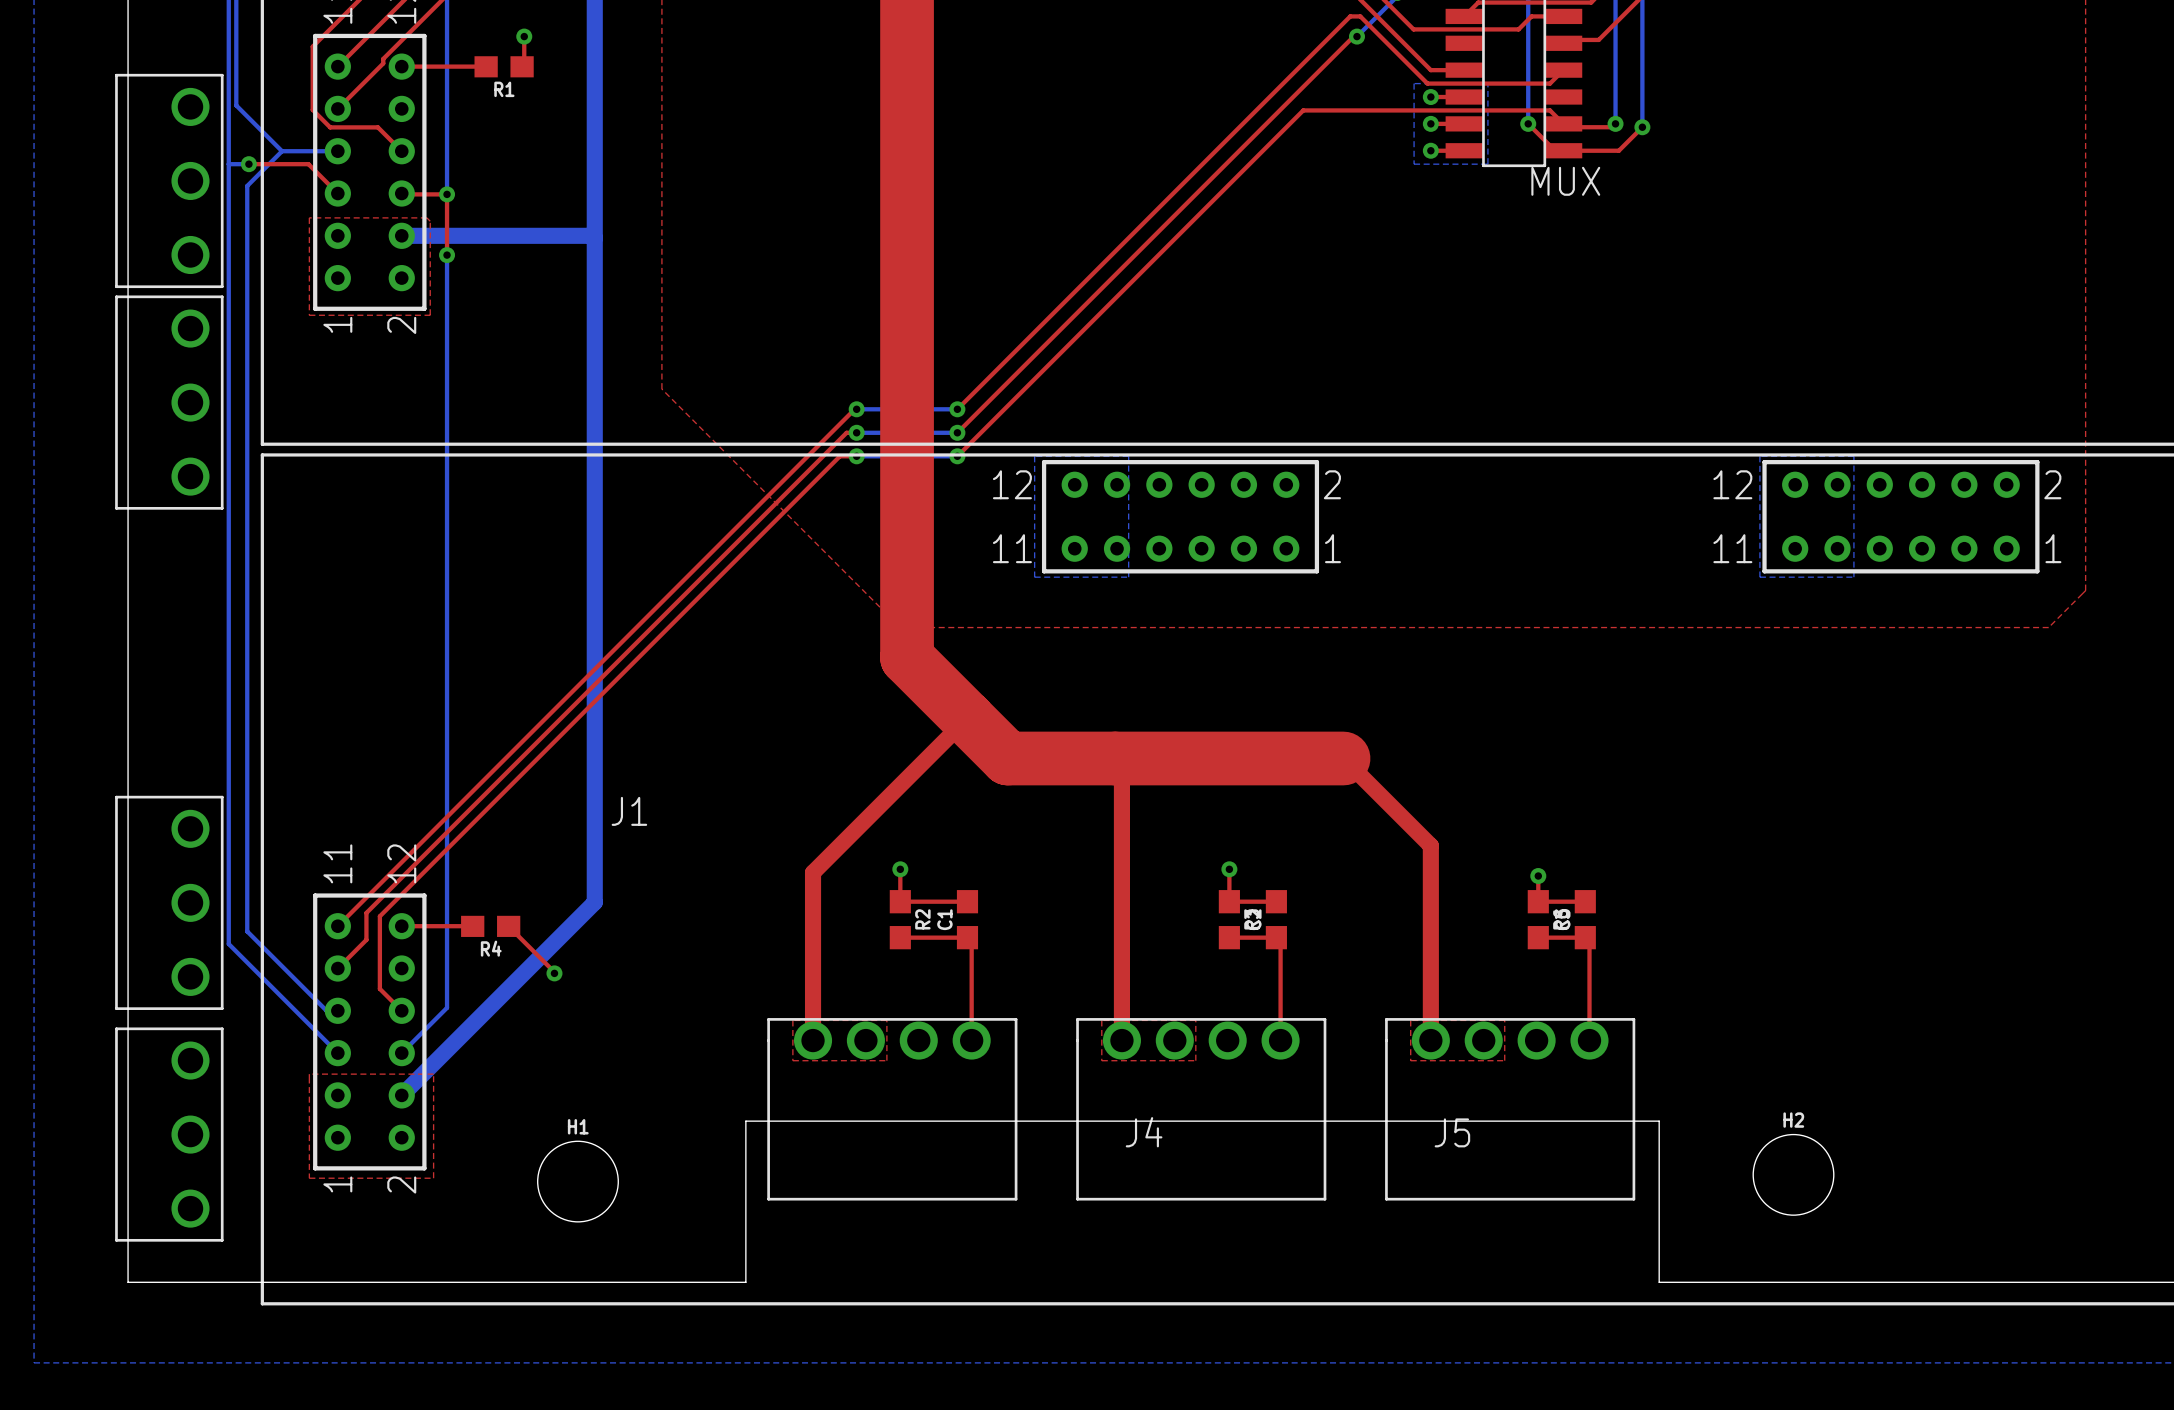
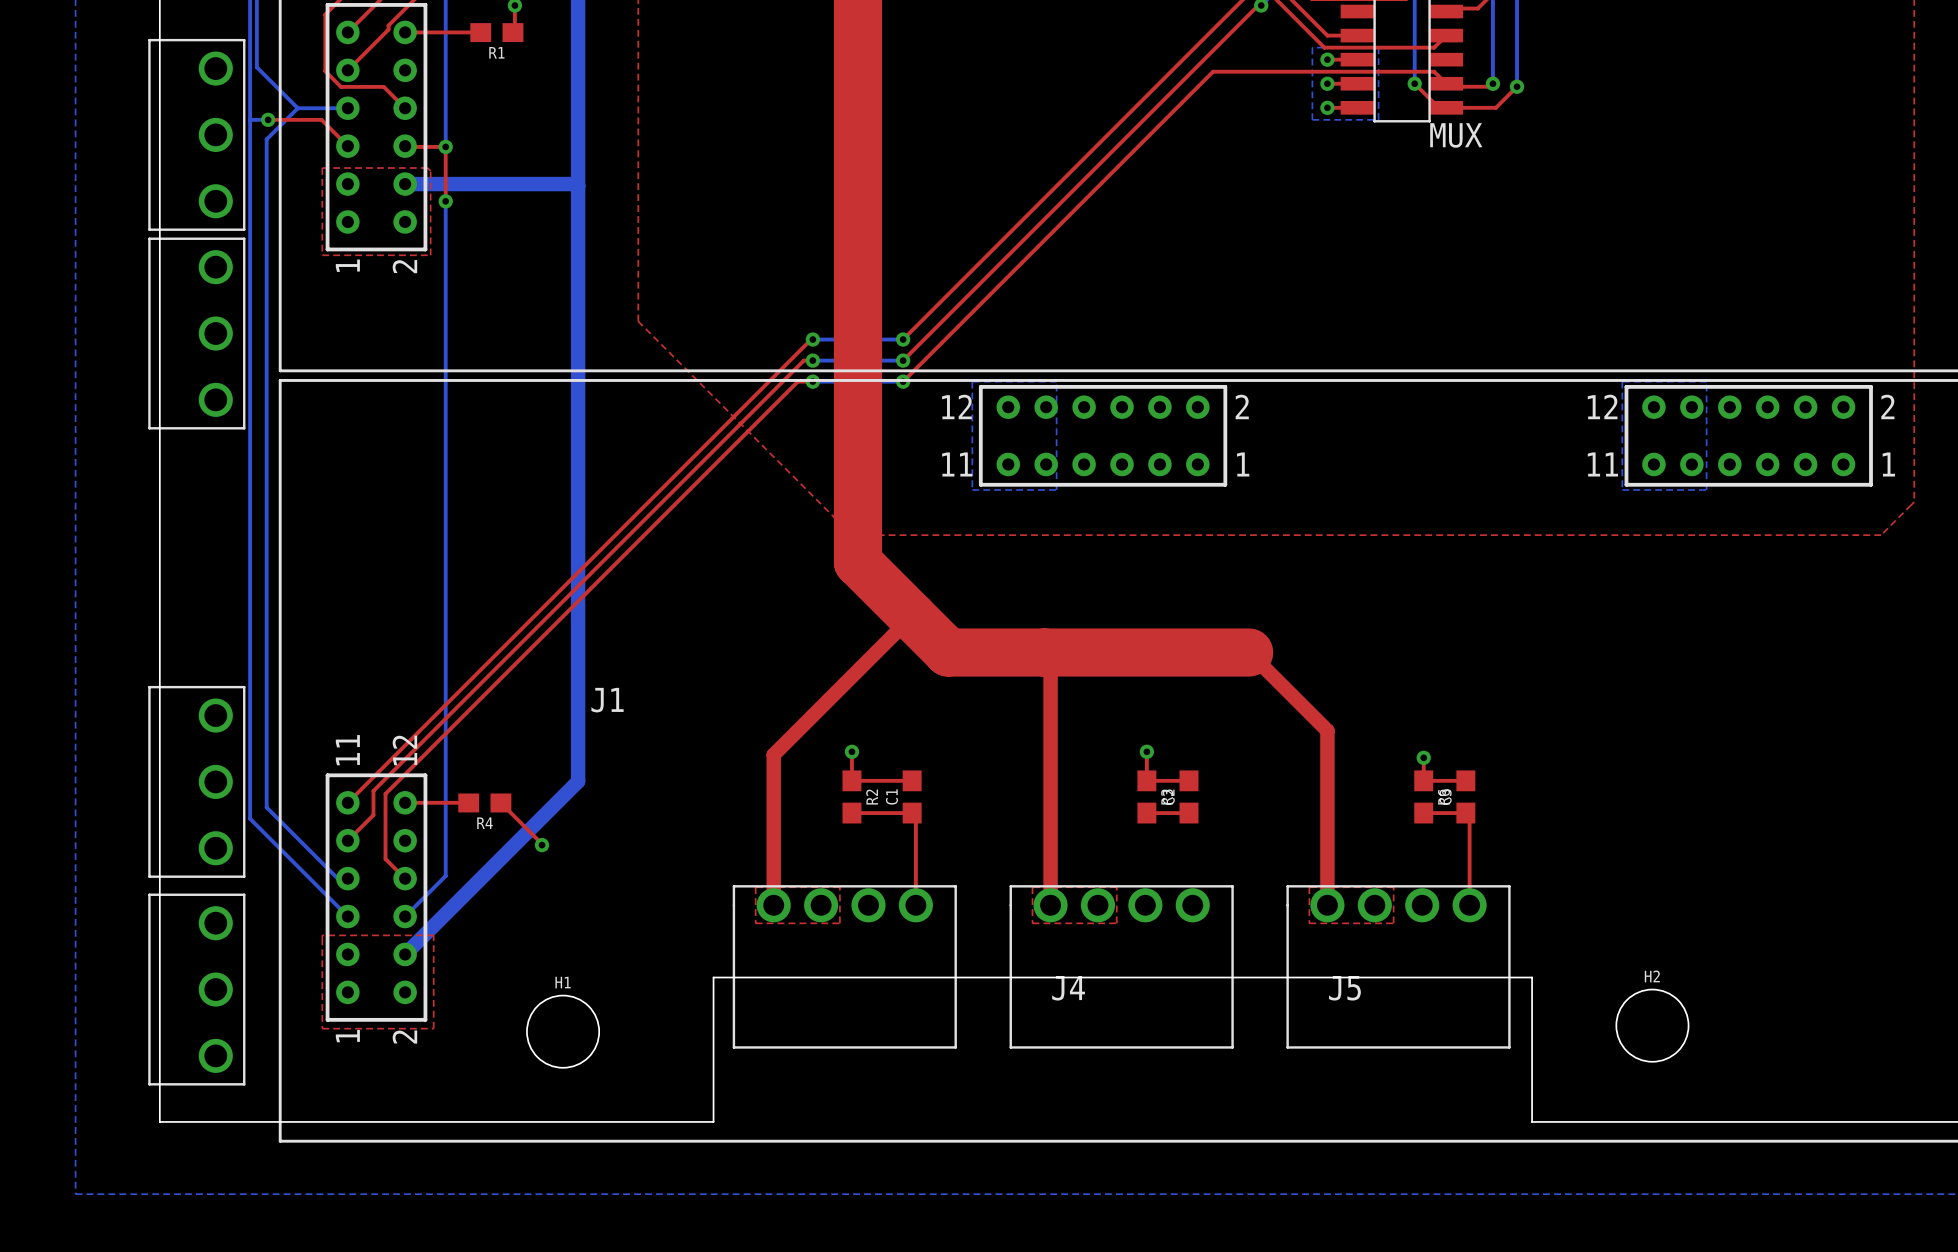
top track: (1276, 937) (1280, 941) (1280, 1040) -> none

